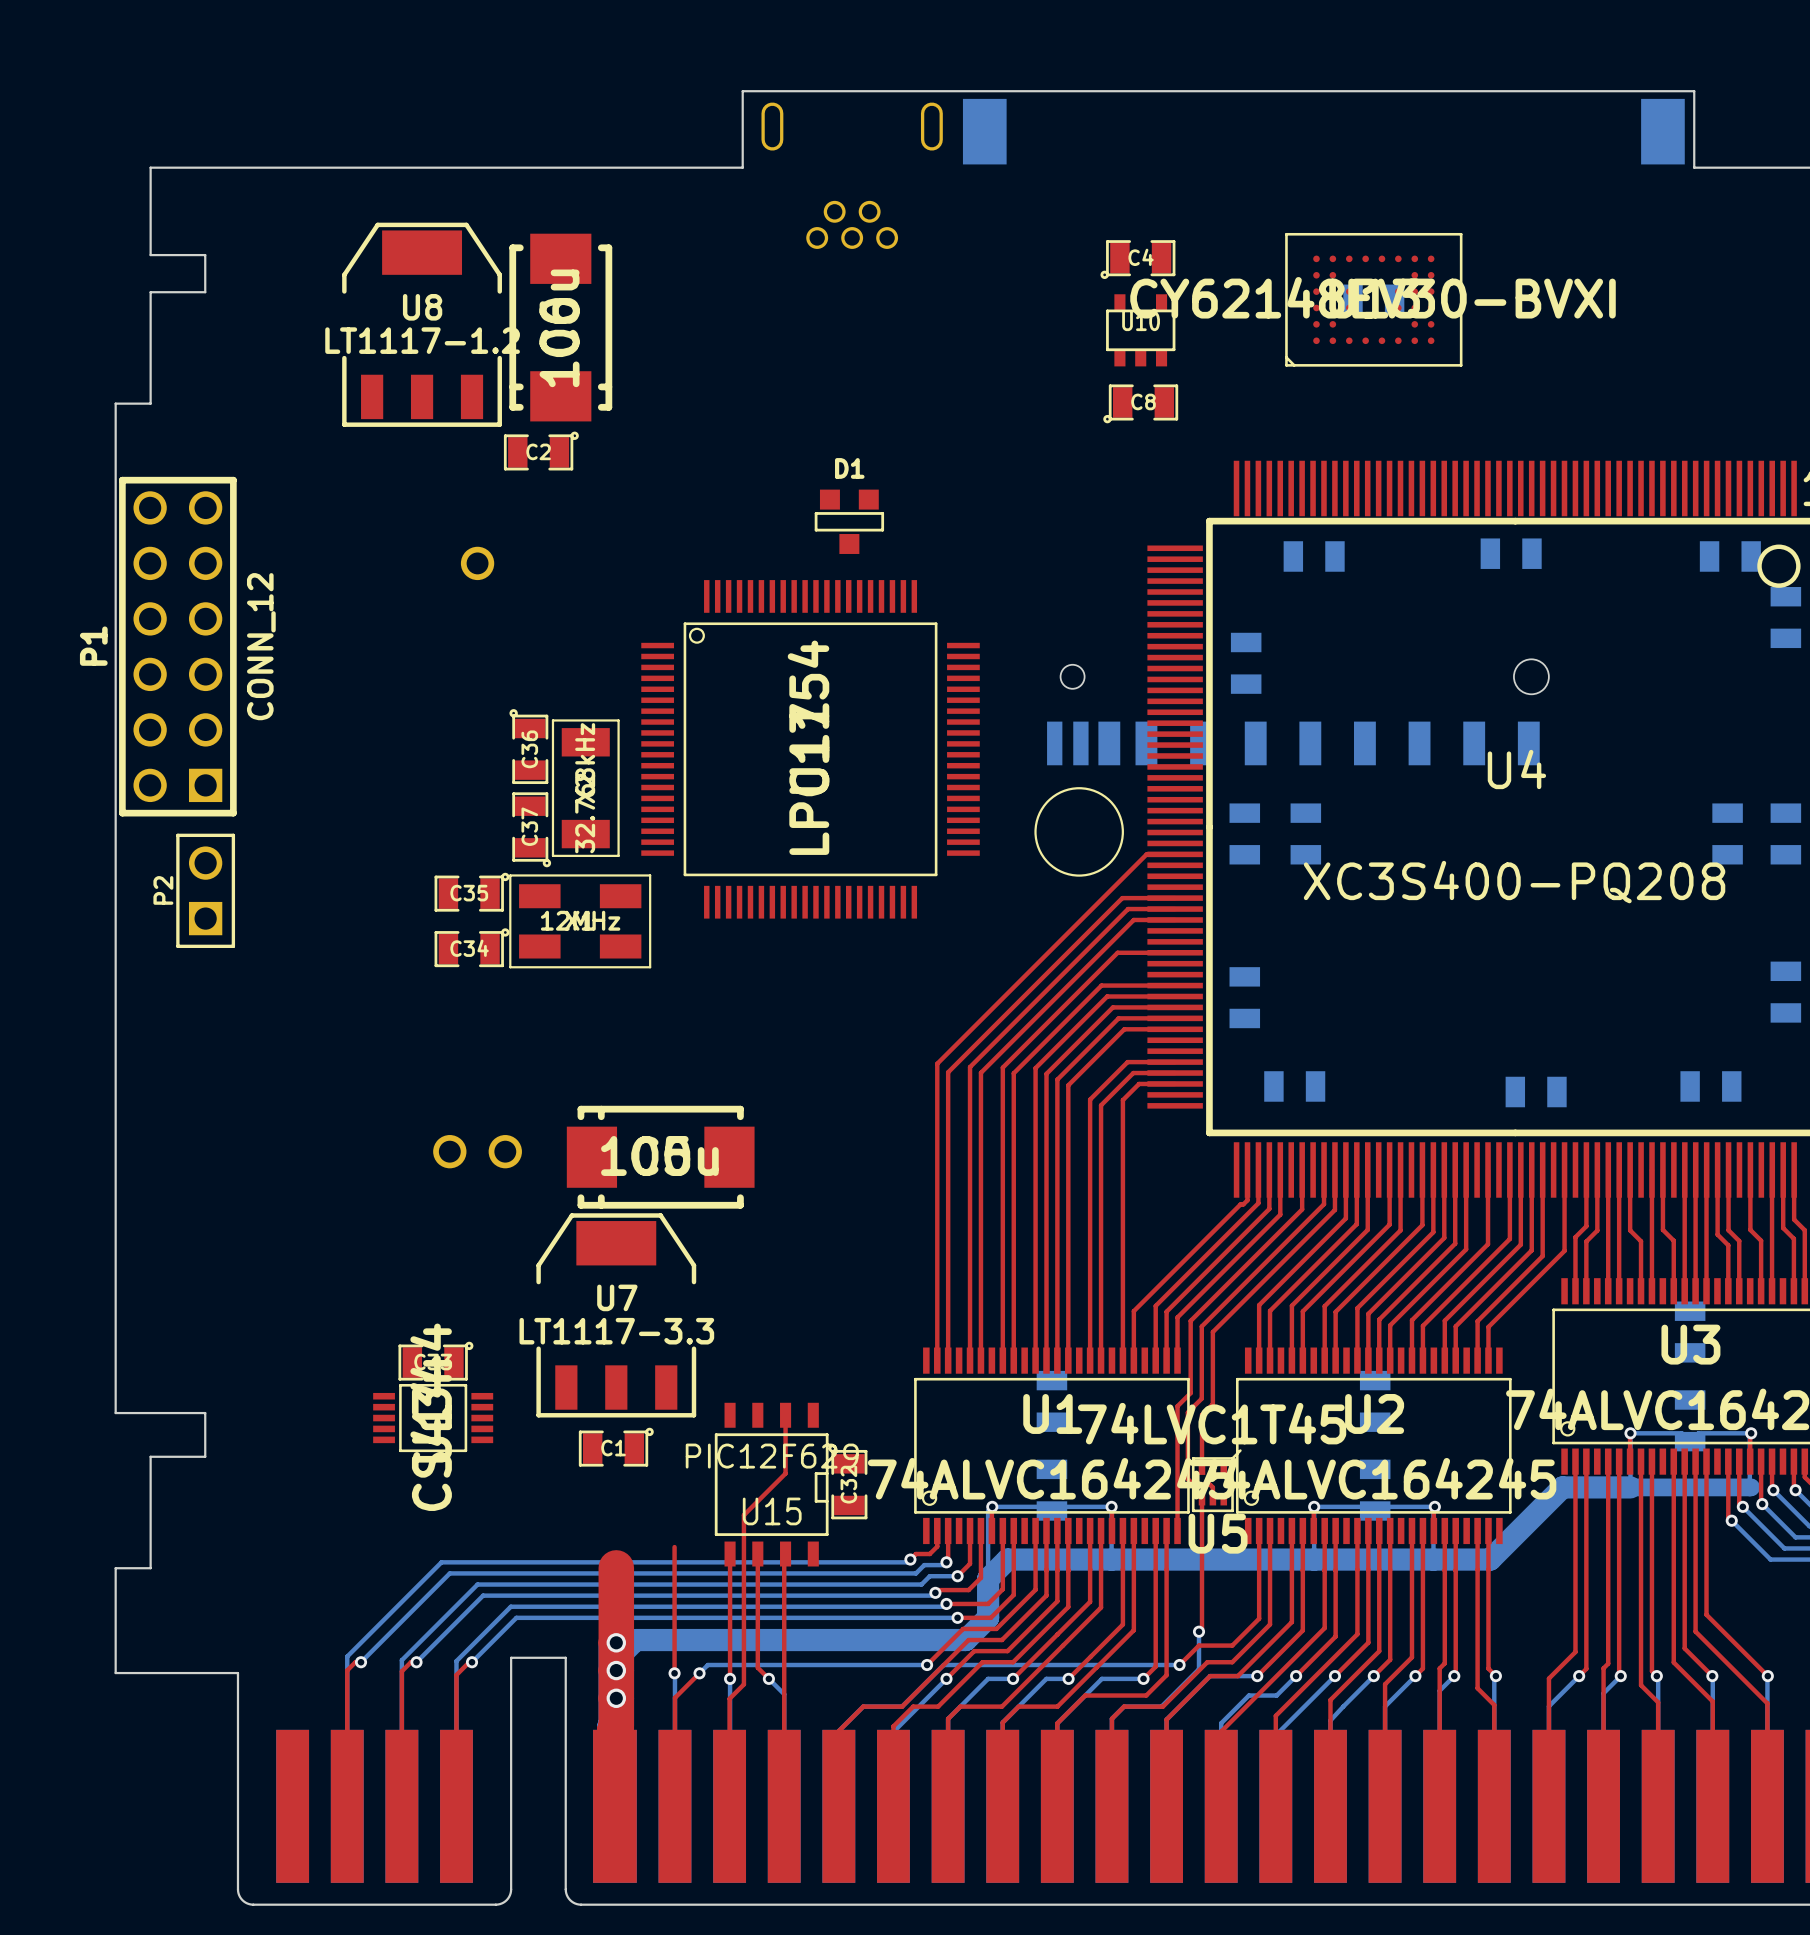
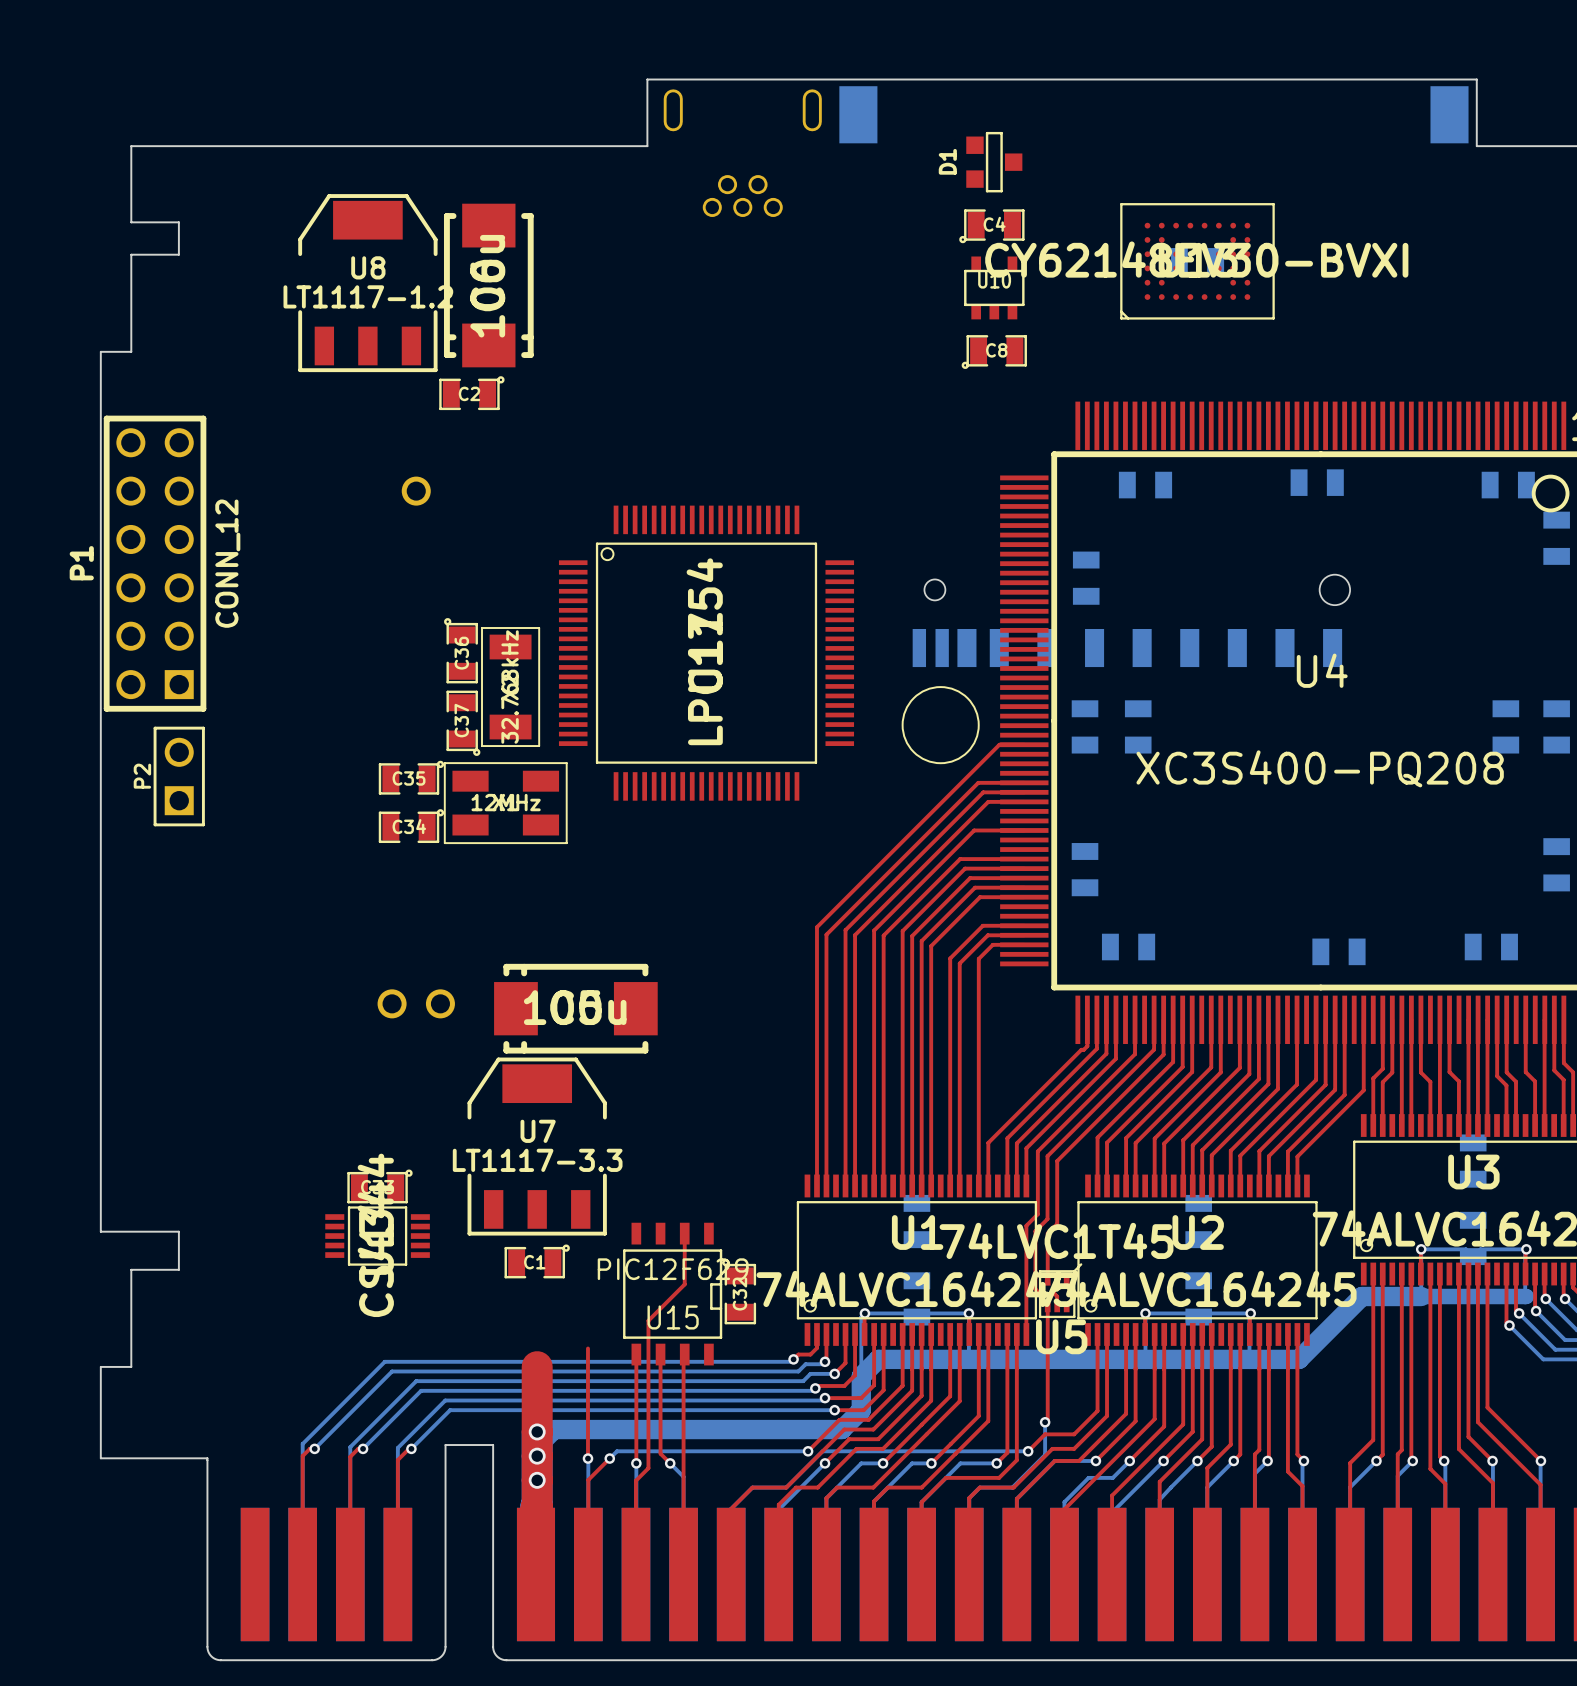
D1 rotation: 0° (849, 521) -> 90° counterclockwise (994, 162)
D1 position: (849, 521) -> (994, 162)

